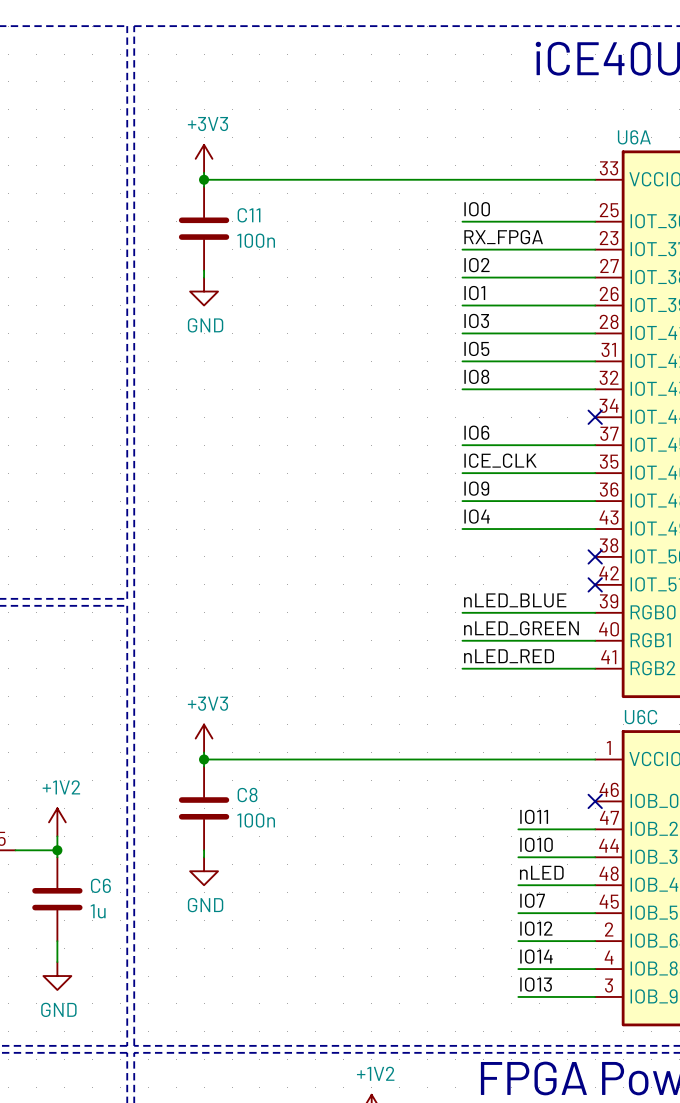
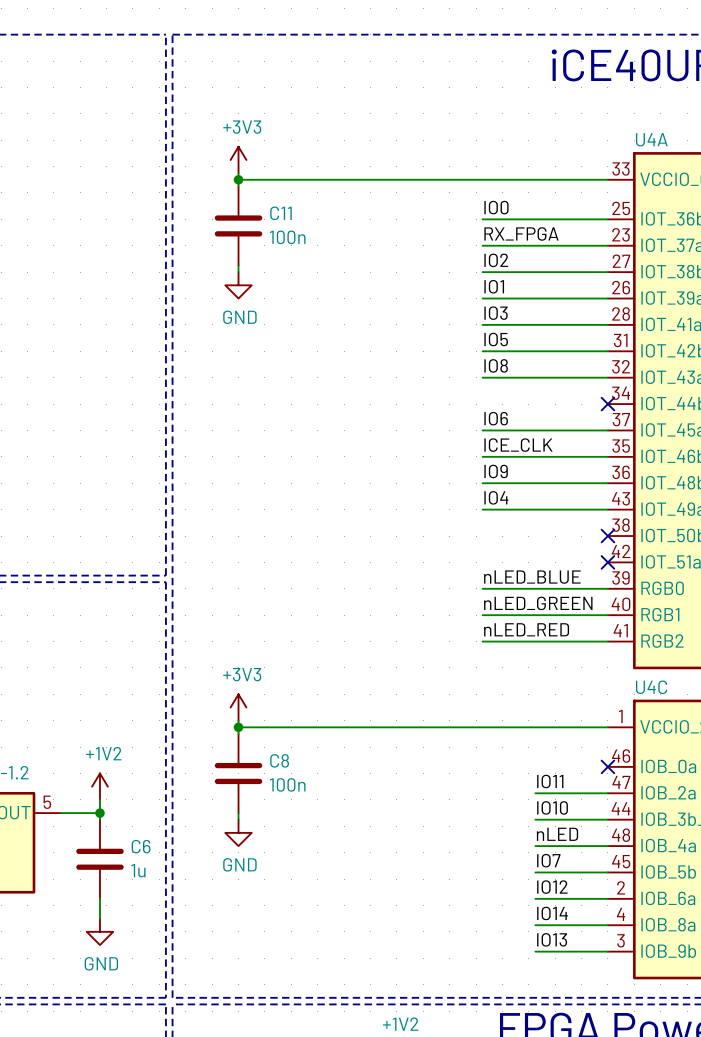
U6A name: U6A (634, 137) -> U4A (651, 139)
U6C name: U6C (641, 717) -> U4C (651, 687)

